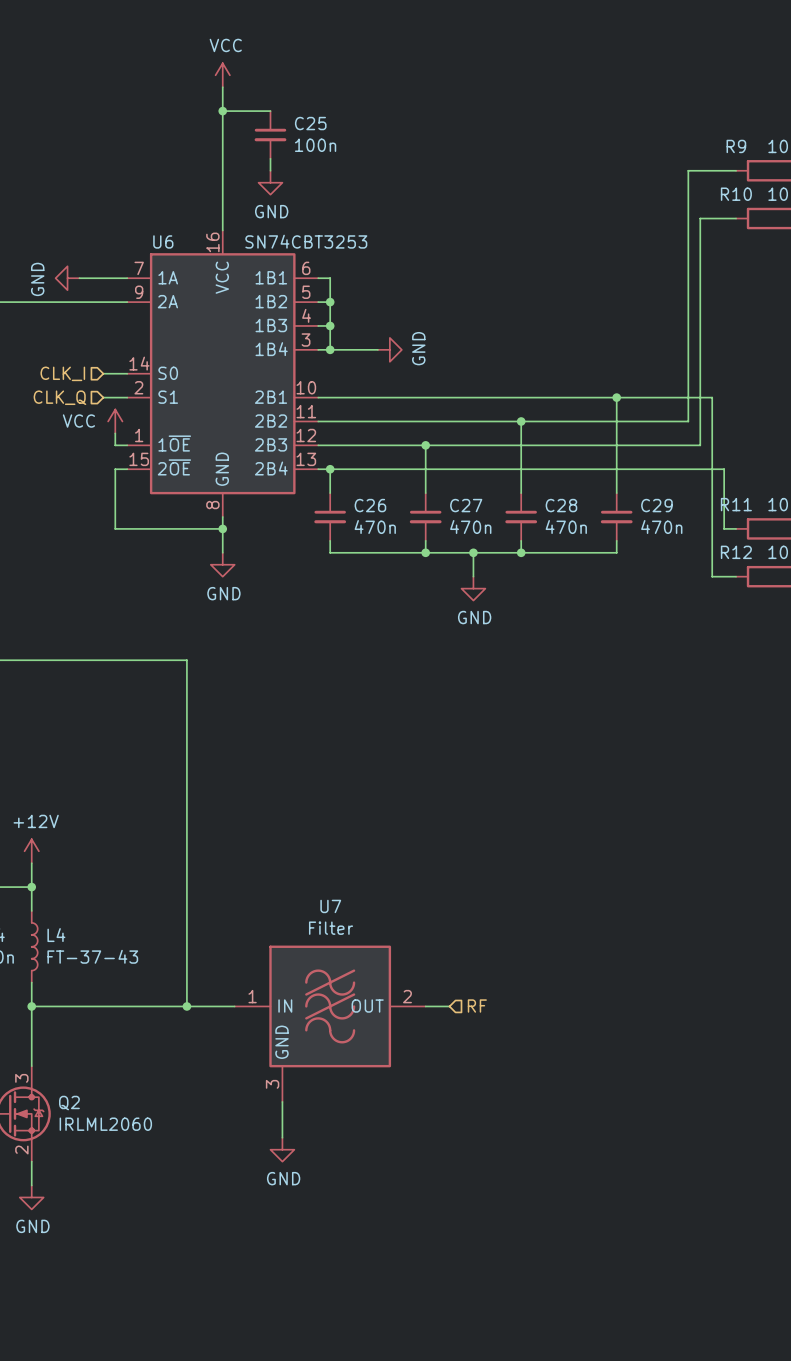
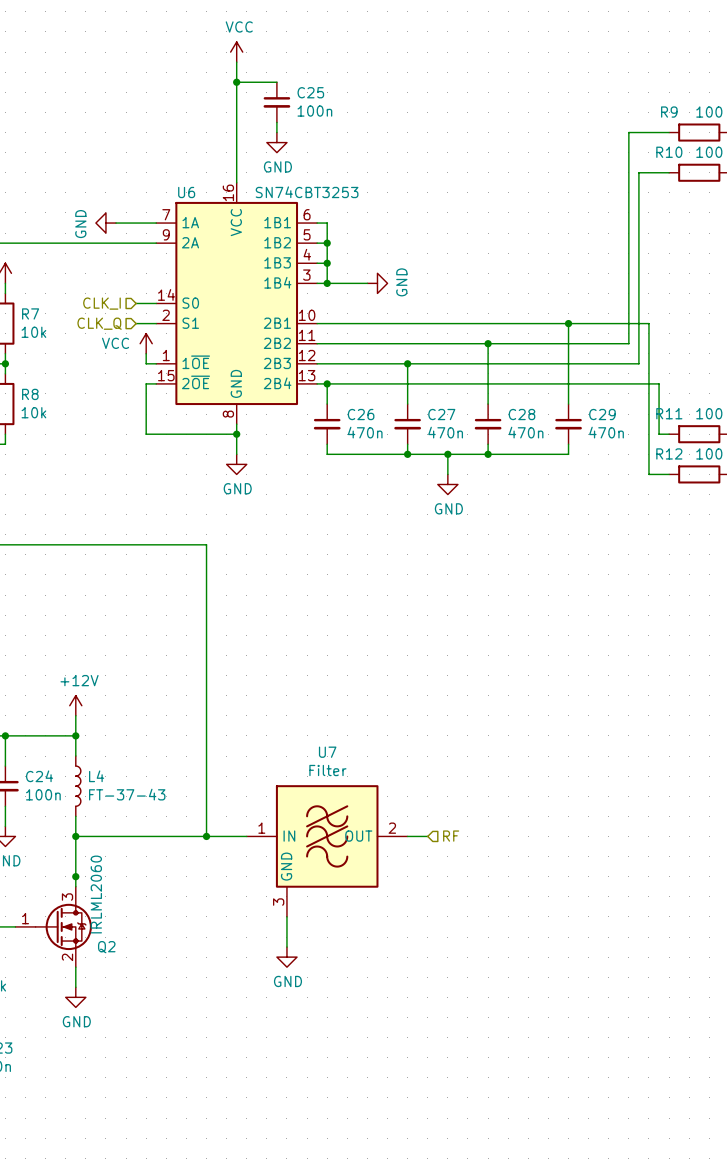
junction: none -> (75, 876)
Q2 name position: Q2 (69, 1103) -> Q2 (106, 947)
Q2 value rotation: 0° (105, 1124) -> 90° counterclockwise (96, 894)

